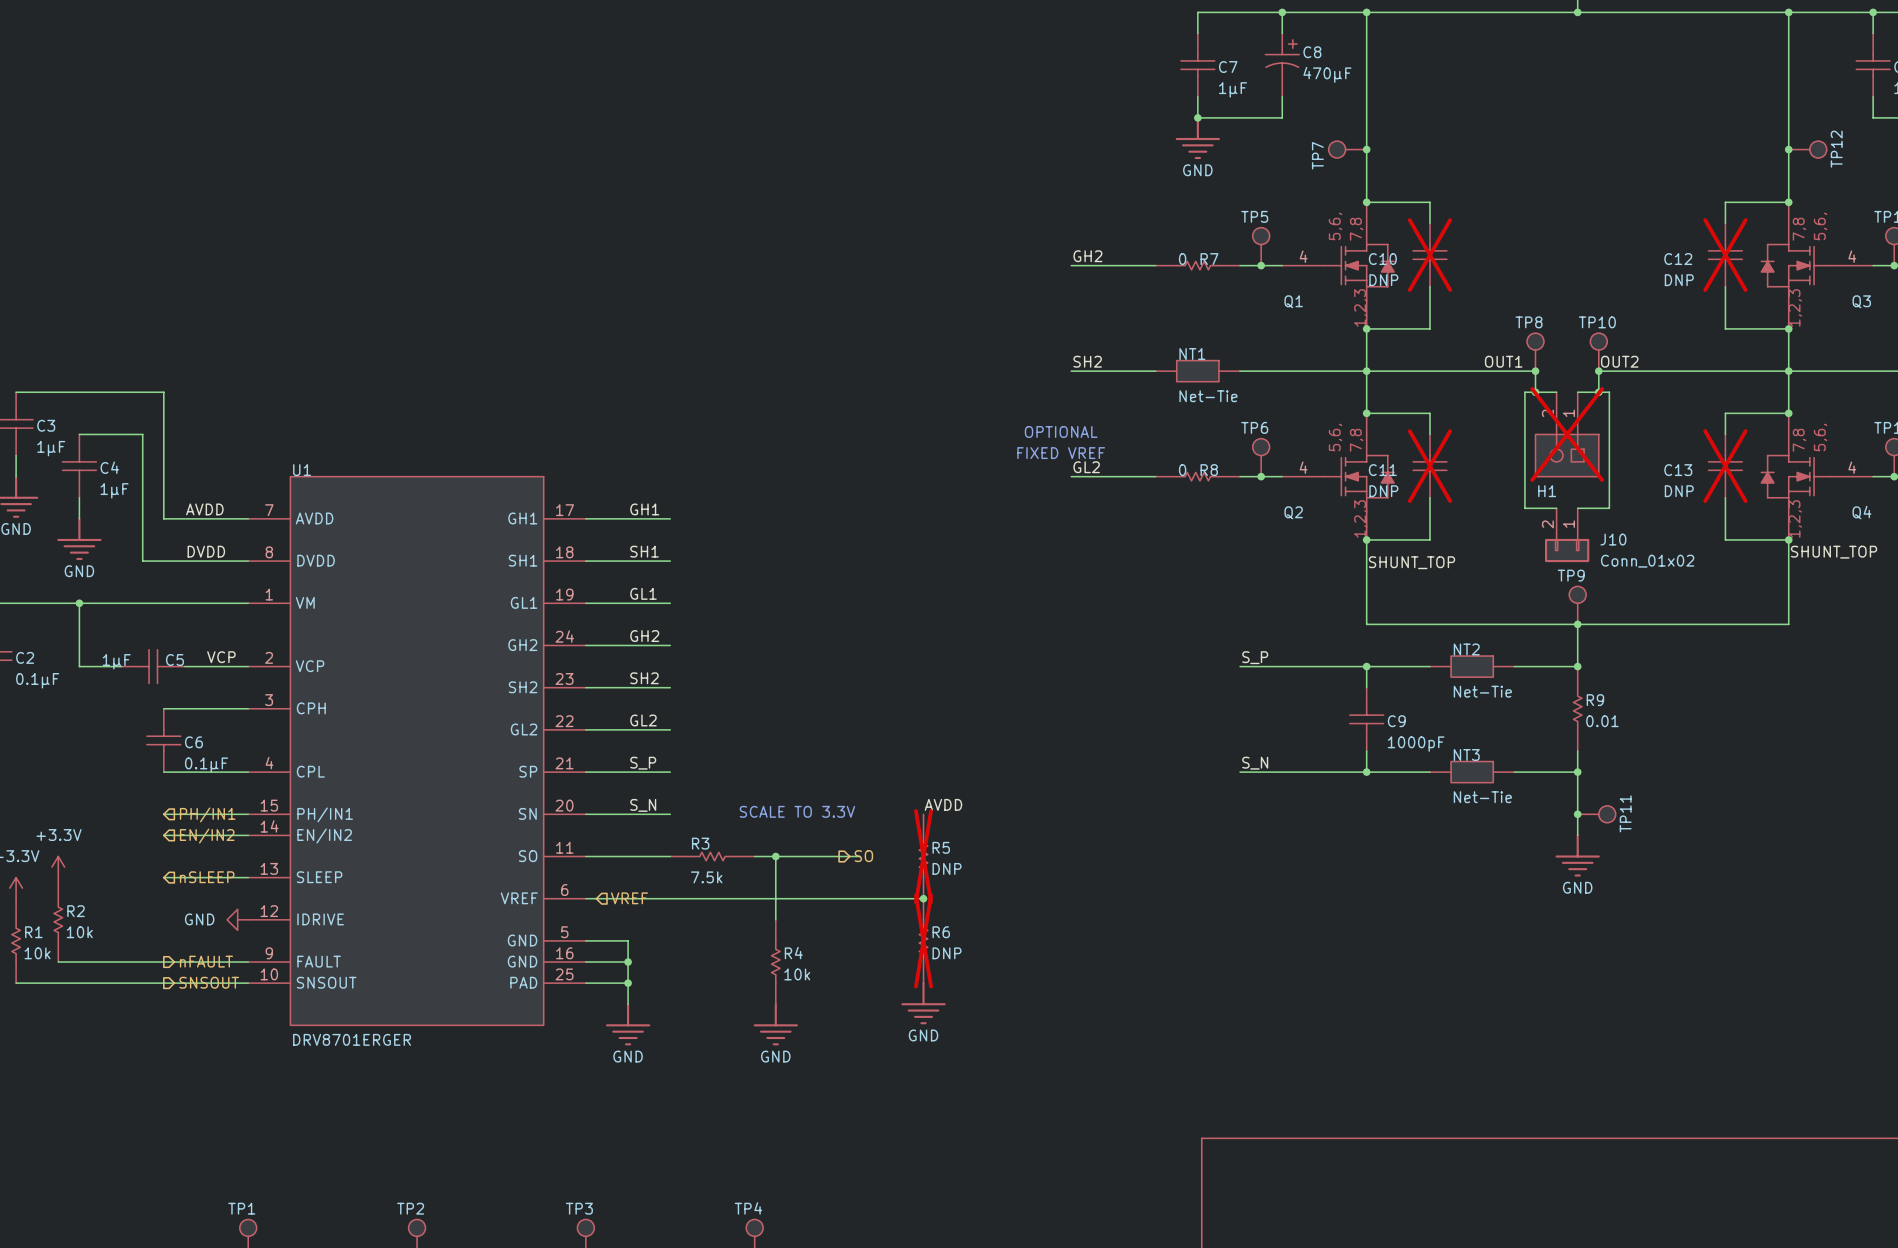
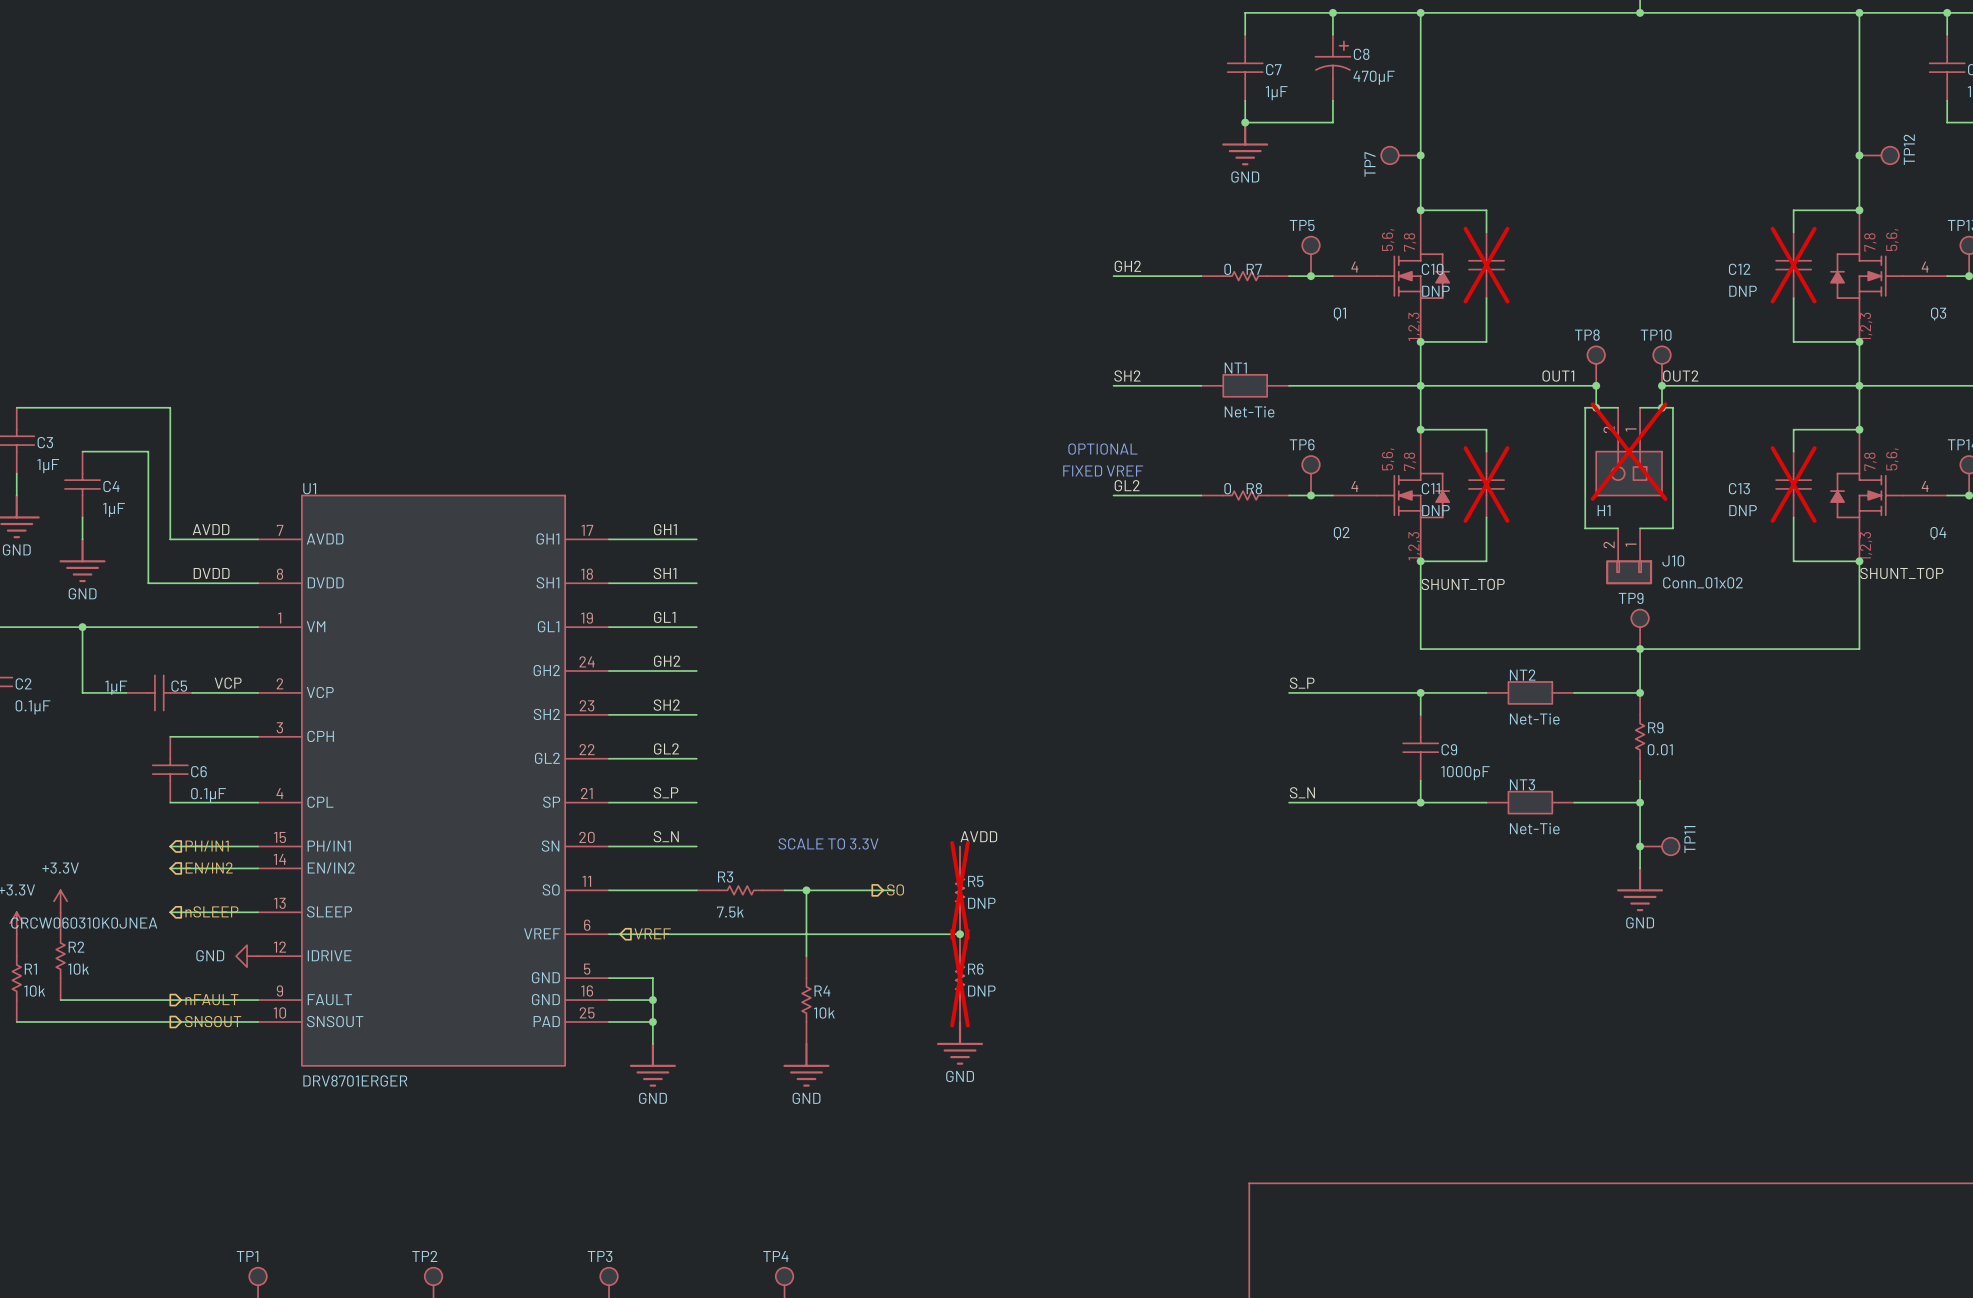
R1 text: none -> CRCW060310K0JNEA (84, 923)

